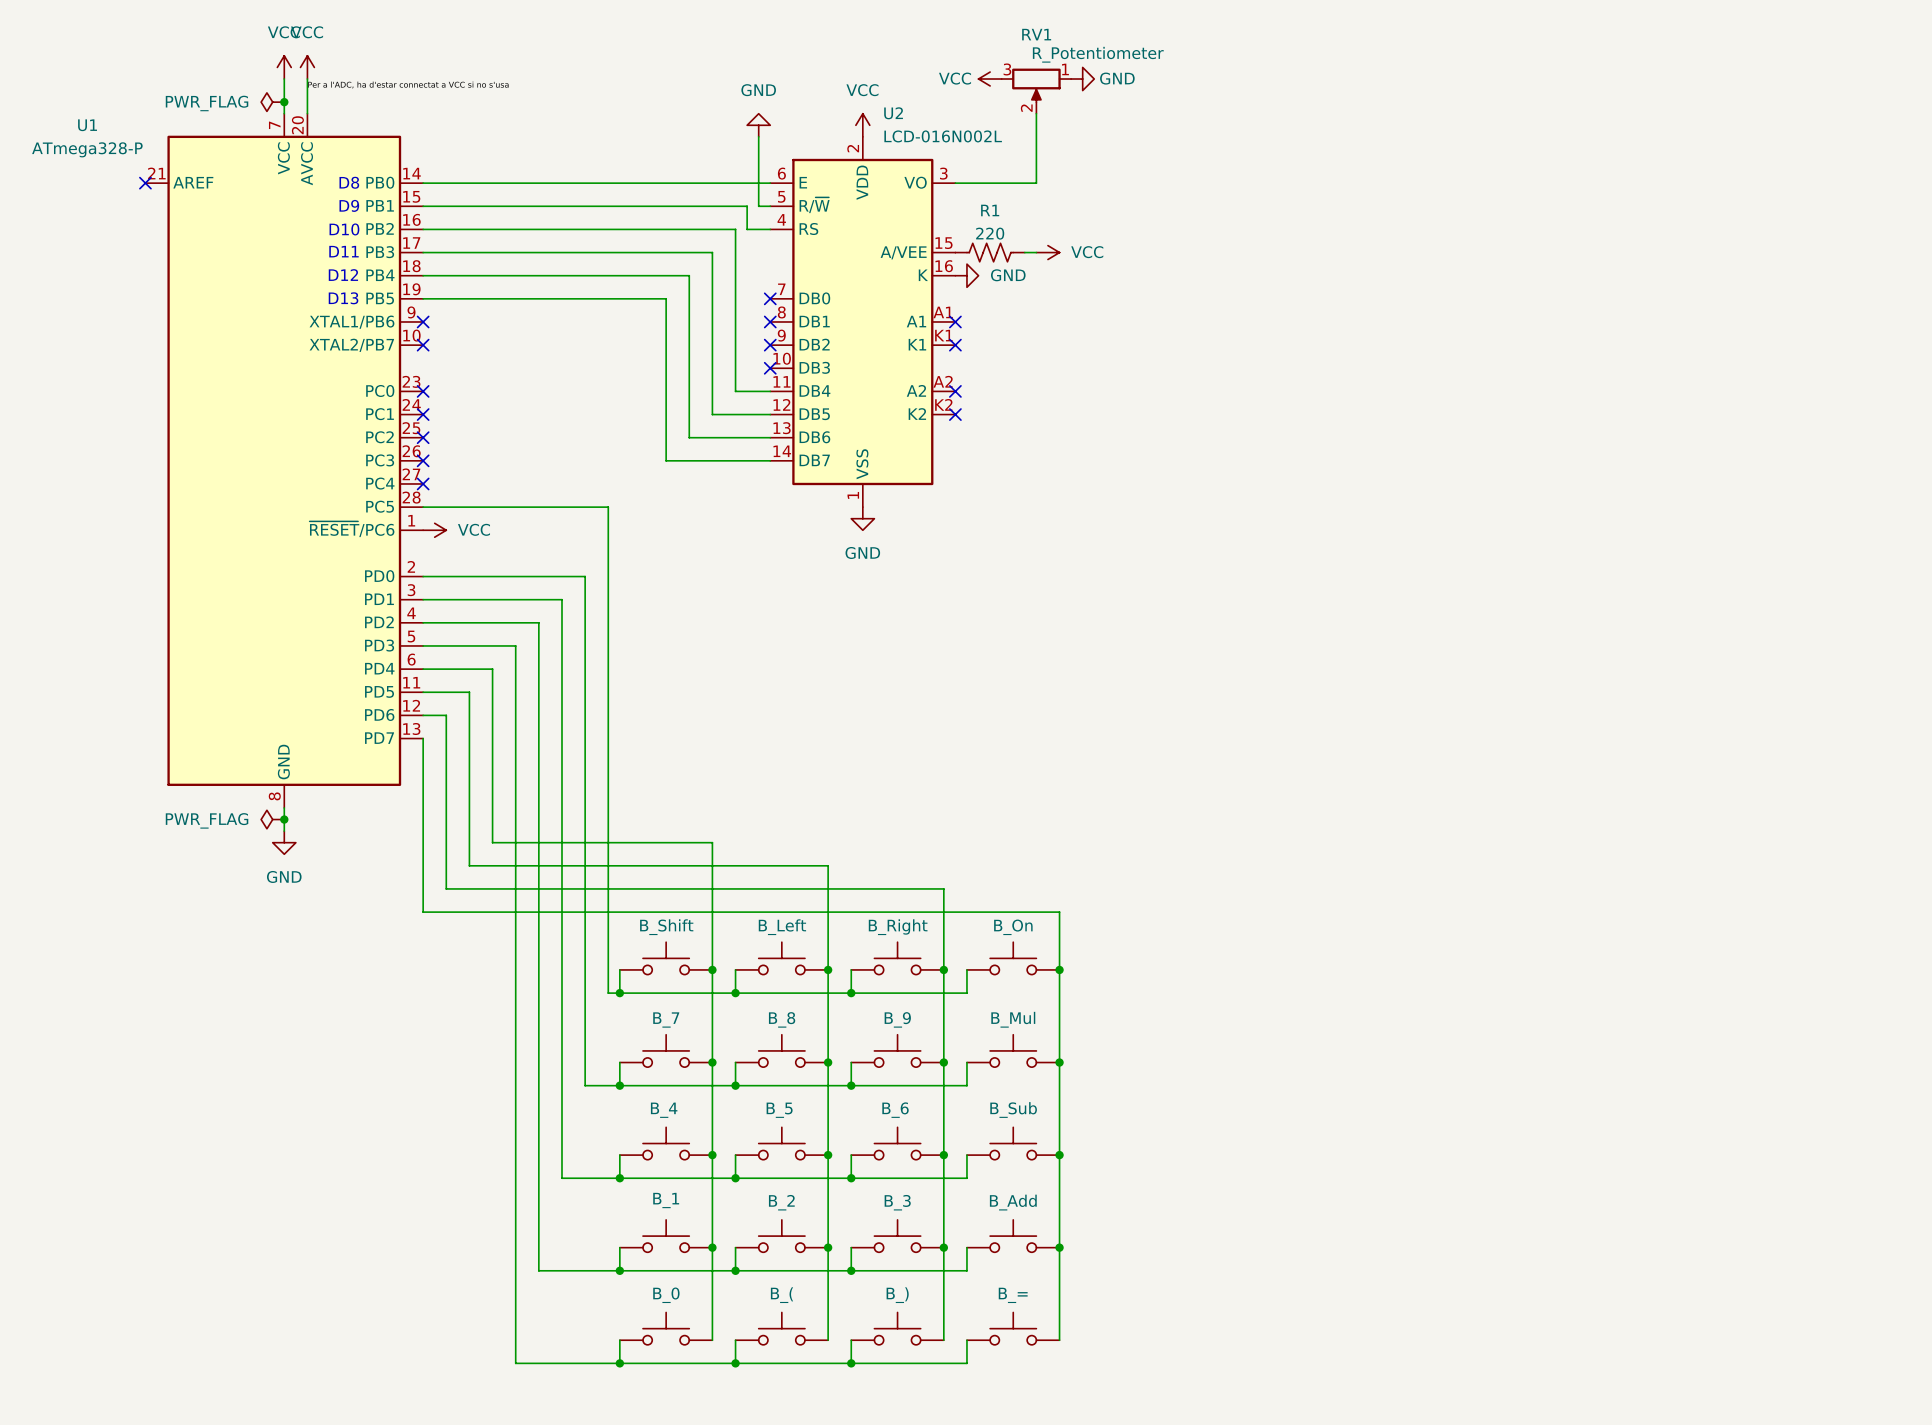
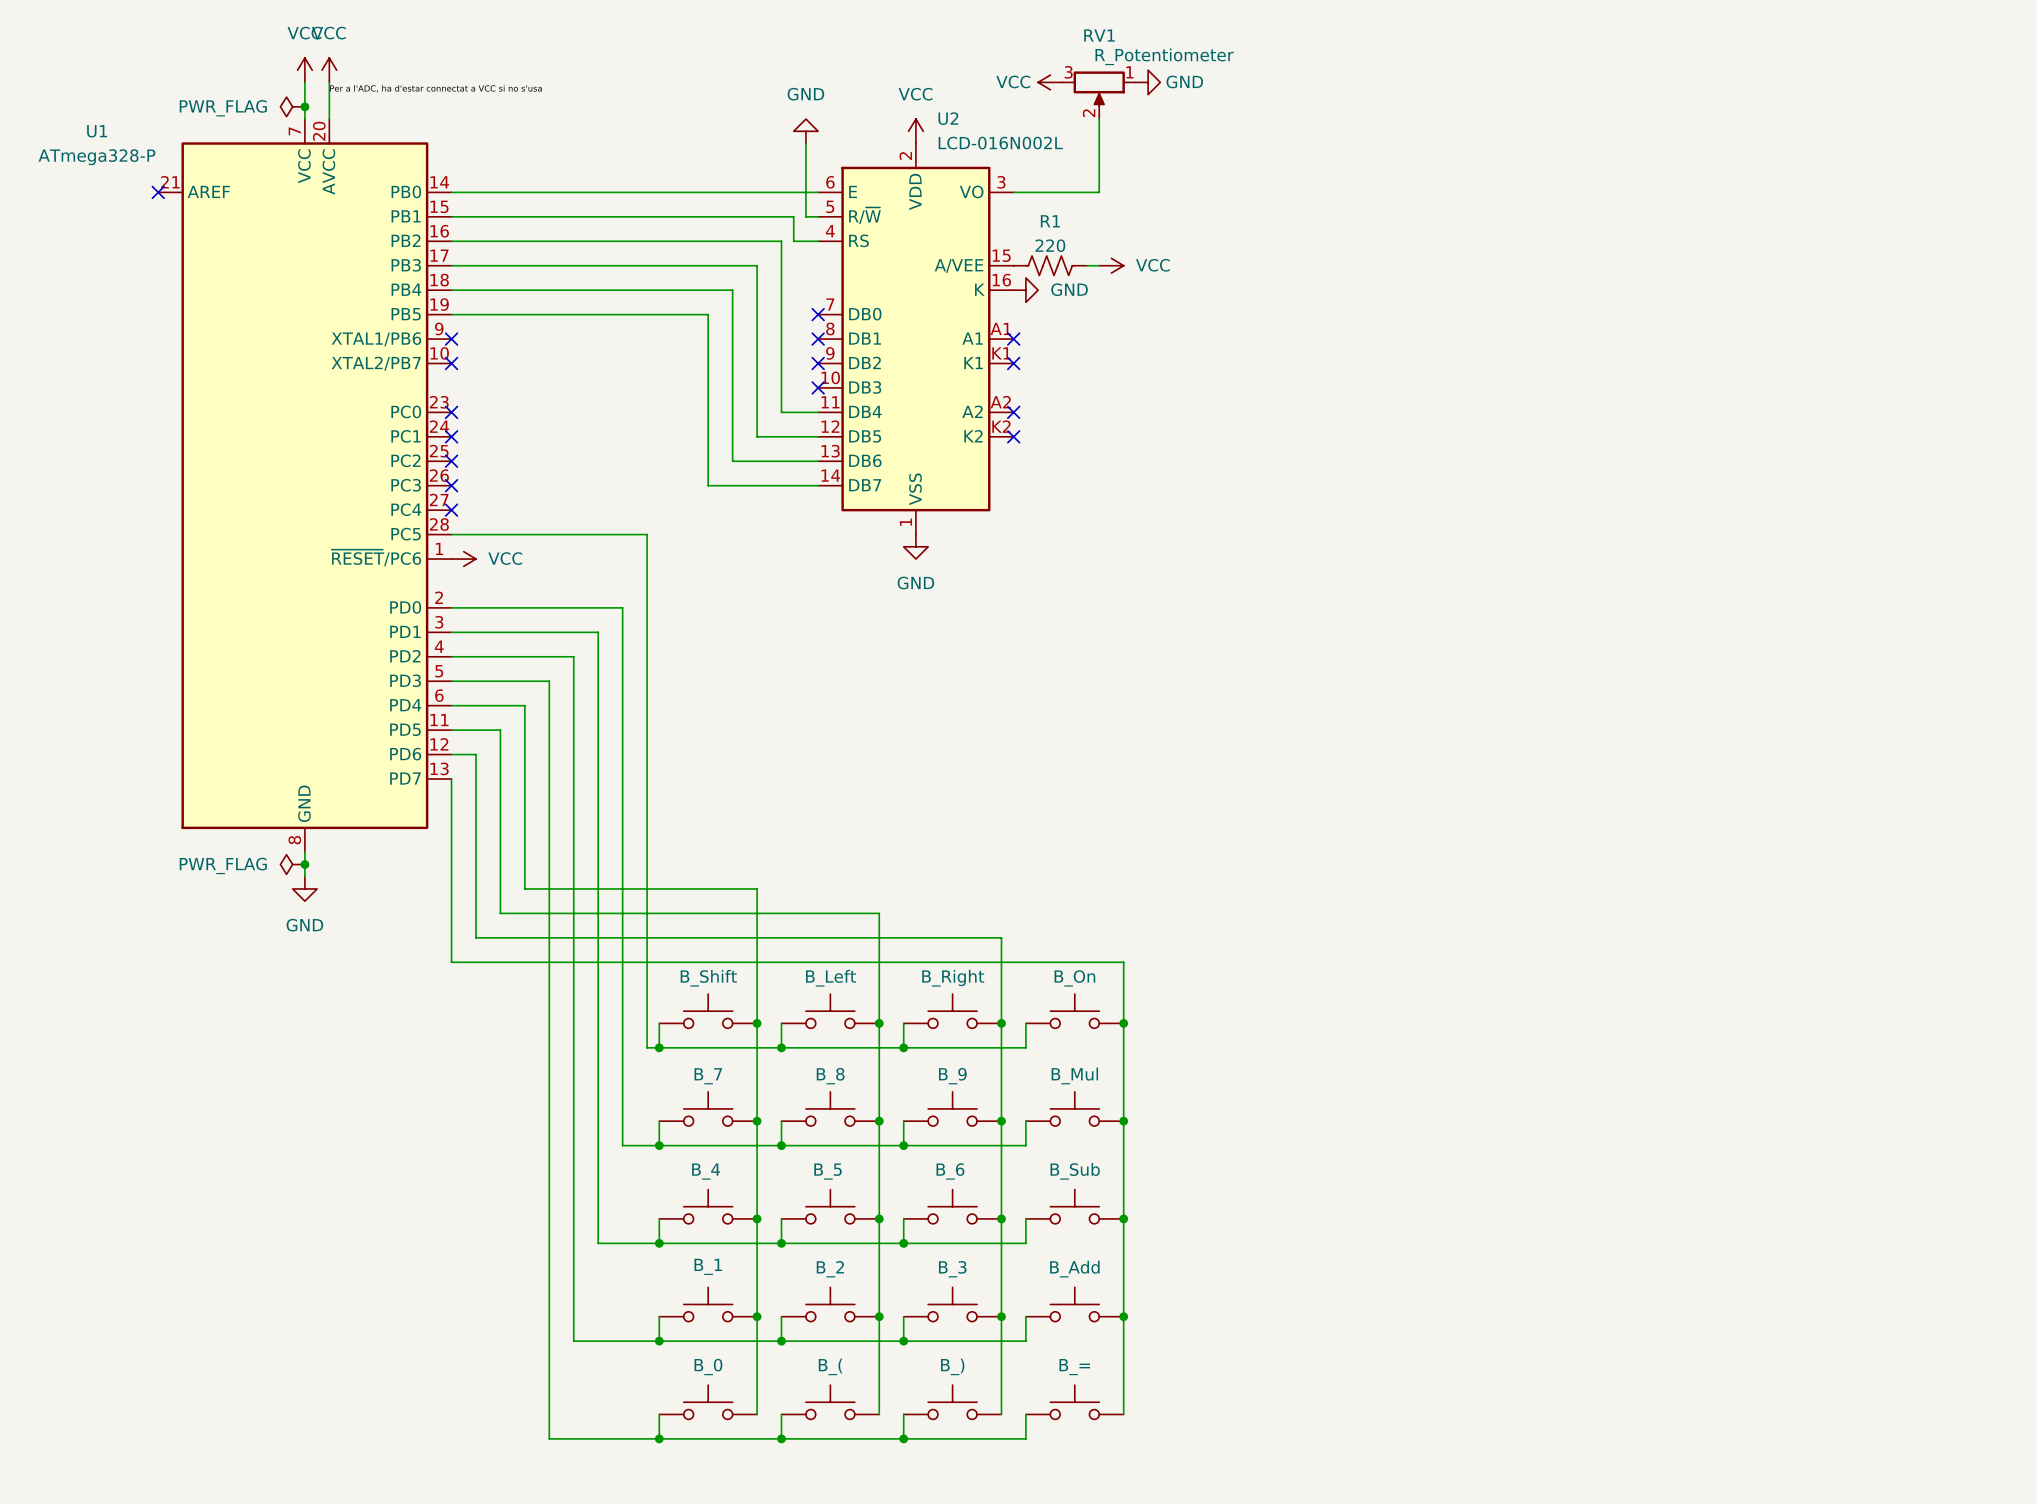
text: D8 (349, 182) -> none
text: D9 (349, 205) -> none
text: D10 (344, 229) -> none
text: D11 (343, 251) -> none
text: D12 (343, 275) -> none
text: D13 (343, 298) -> none

